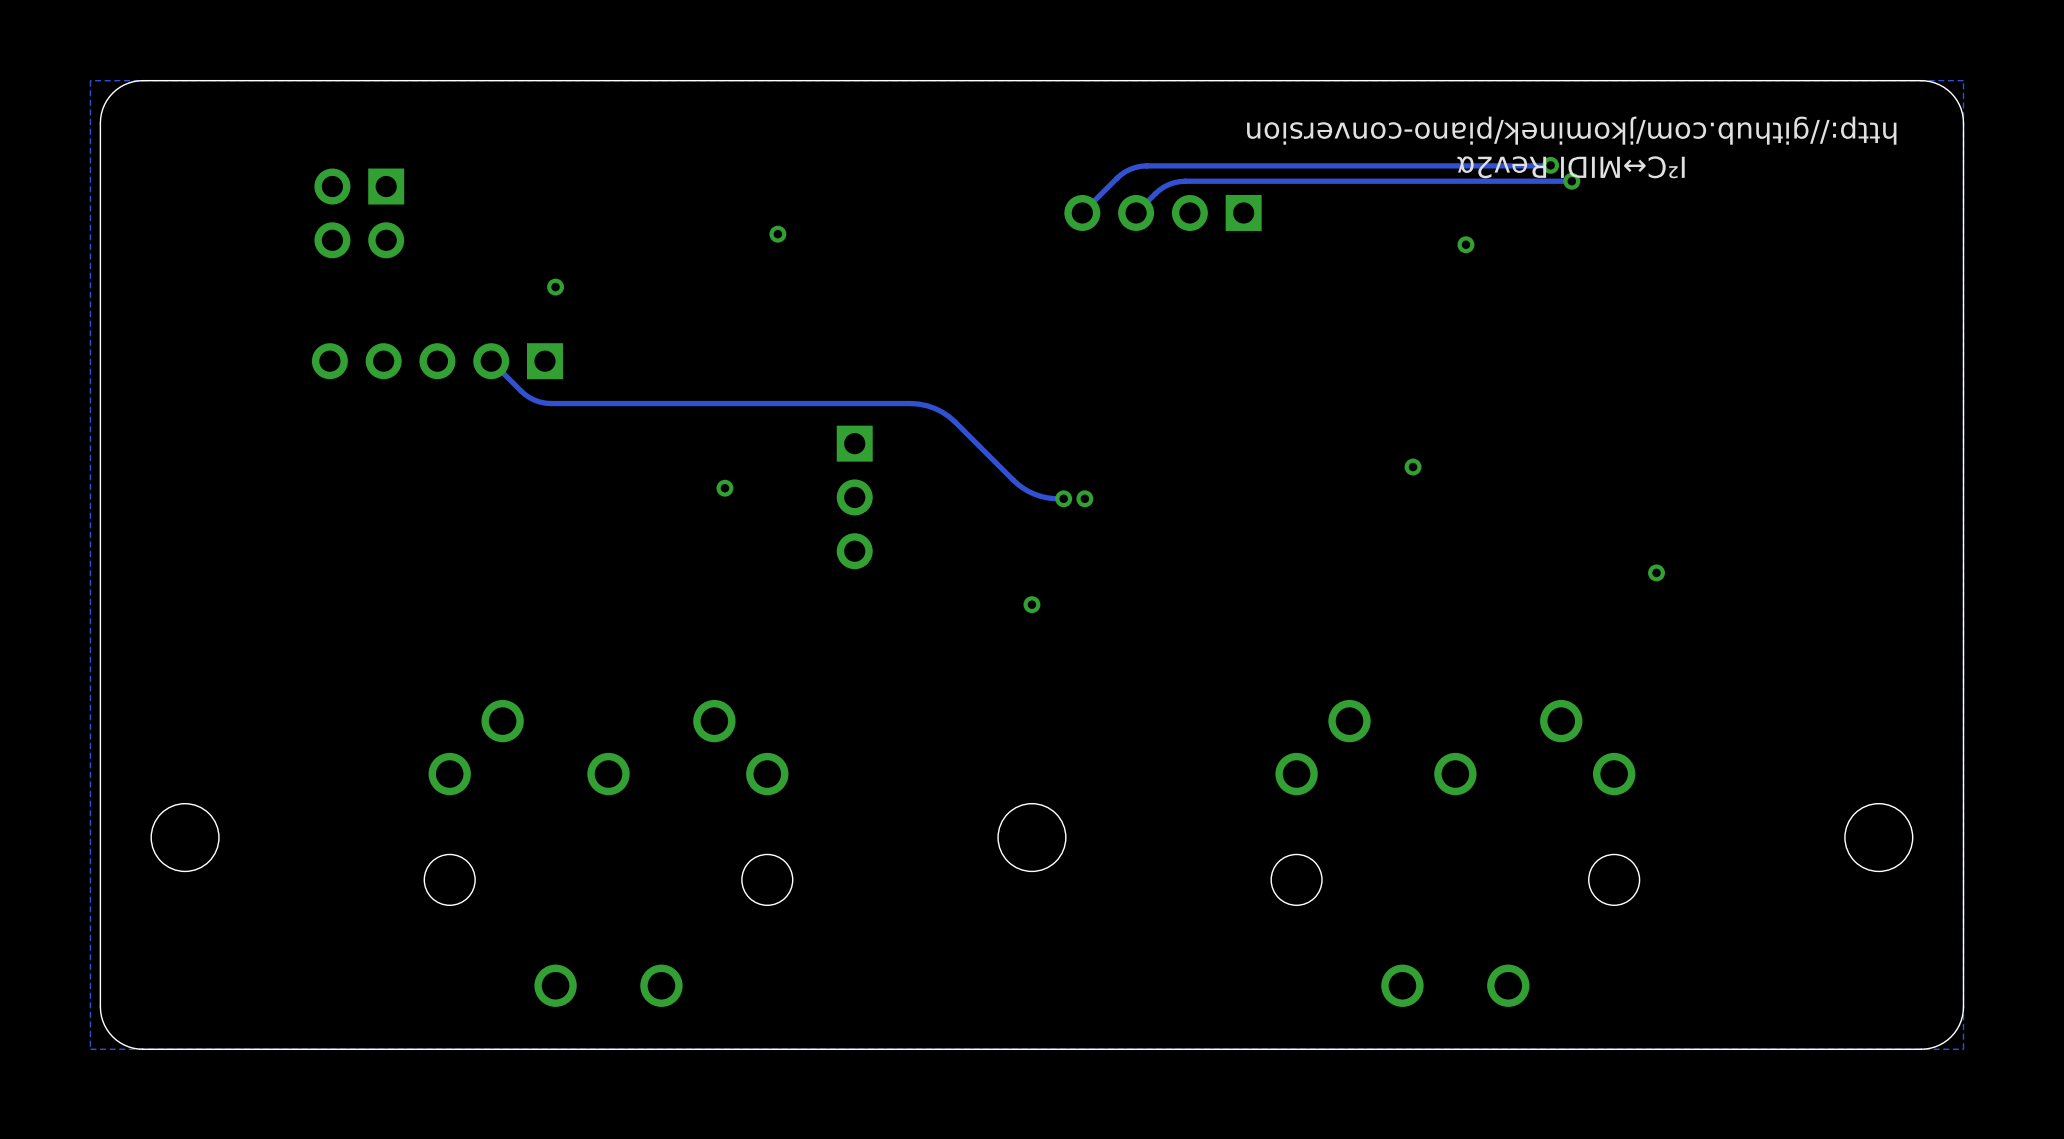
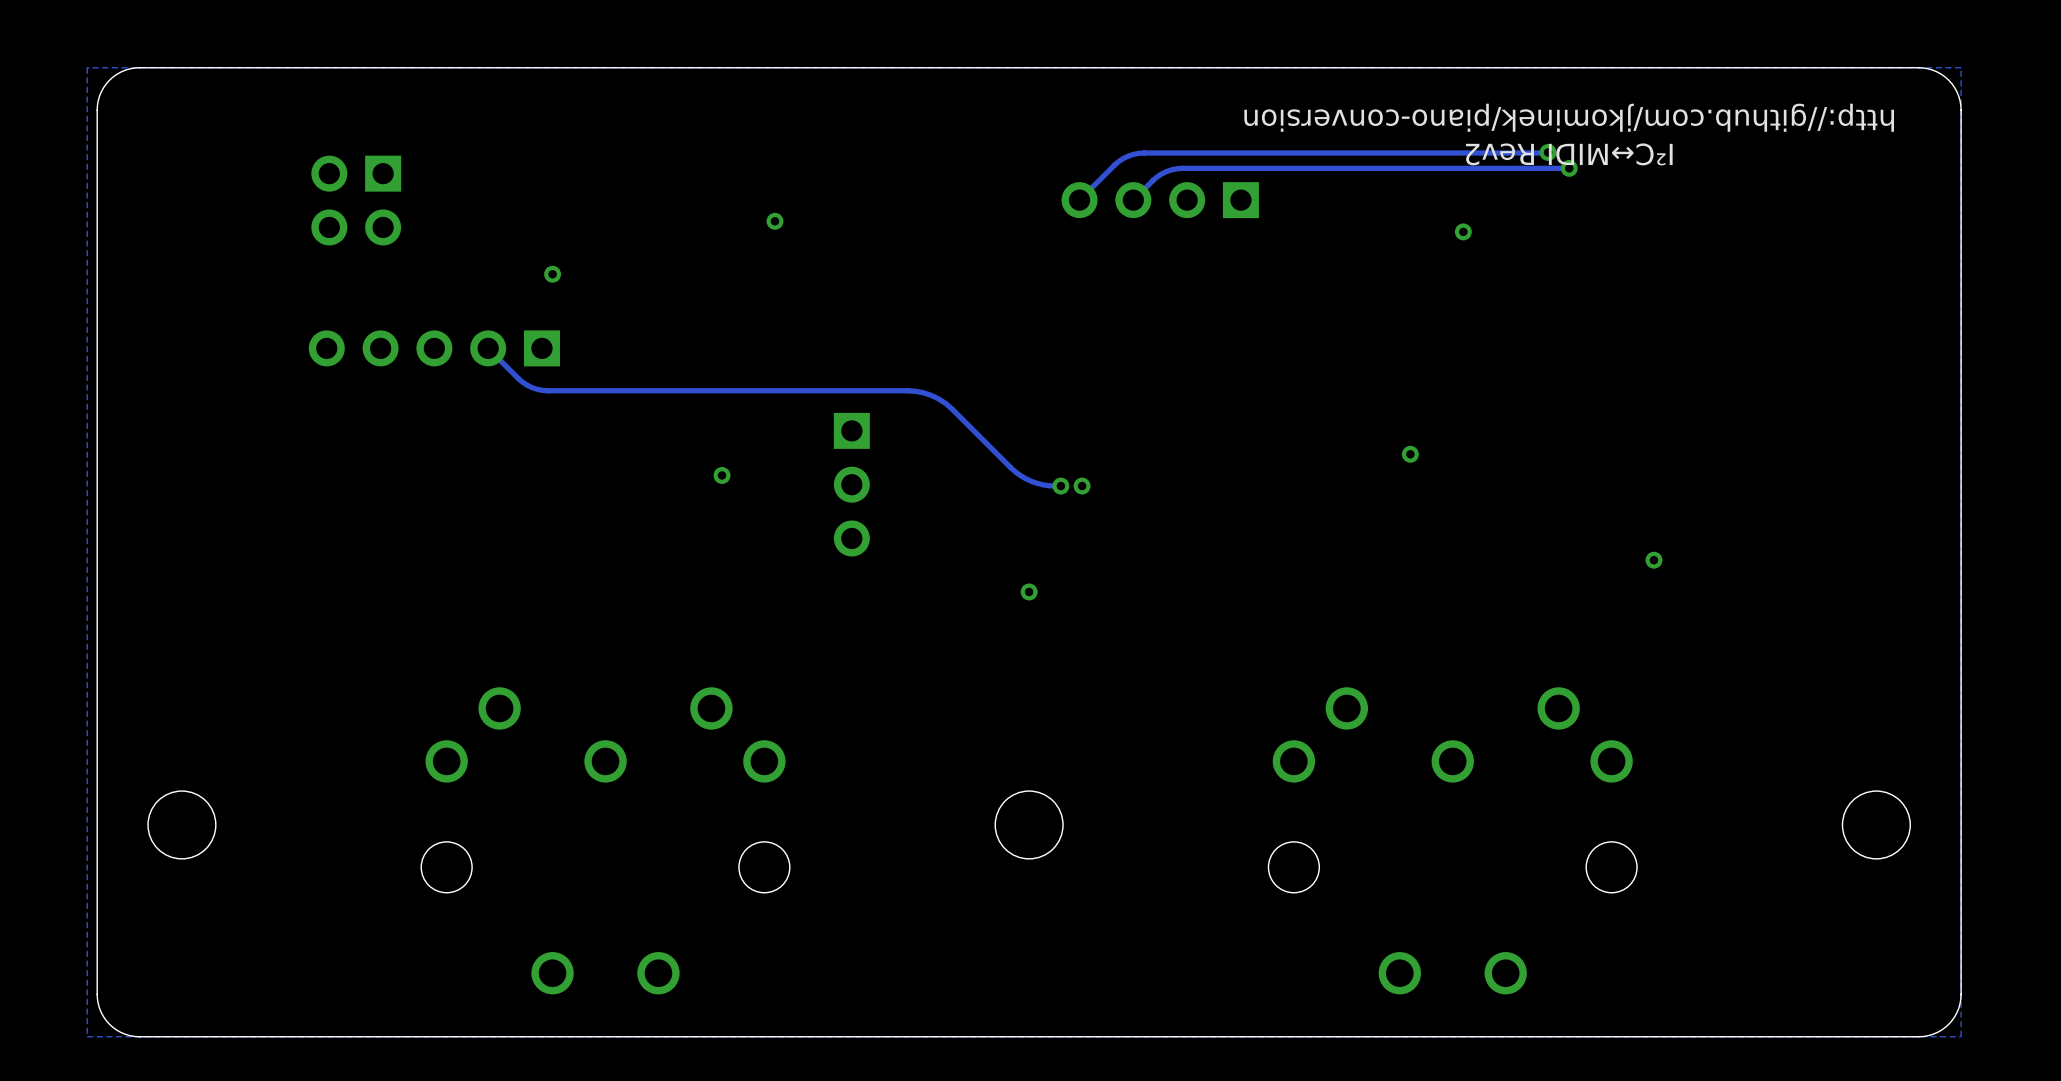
text: I²C↔MIDI Rev2α (1571, 167) -> I²C↔MIDI Rev2 (1569, 154)

